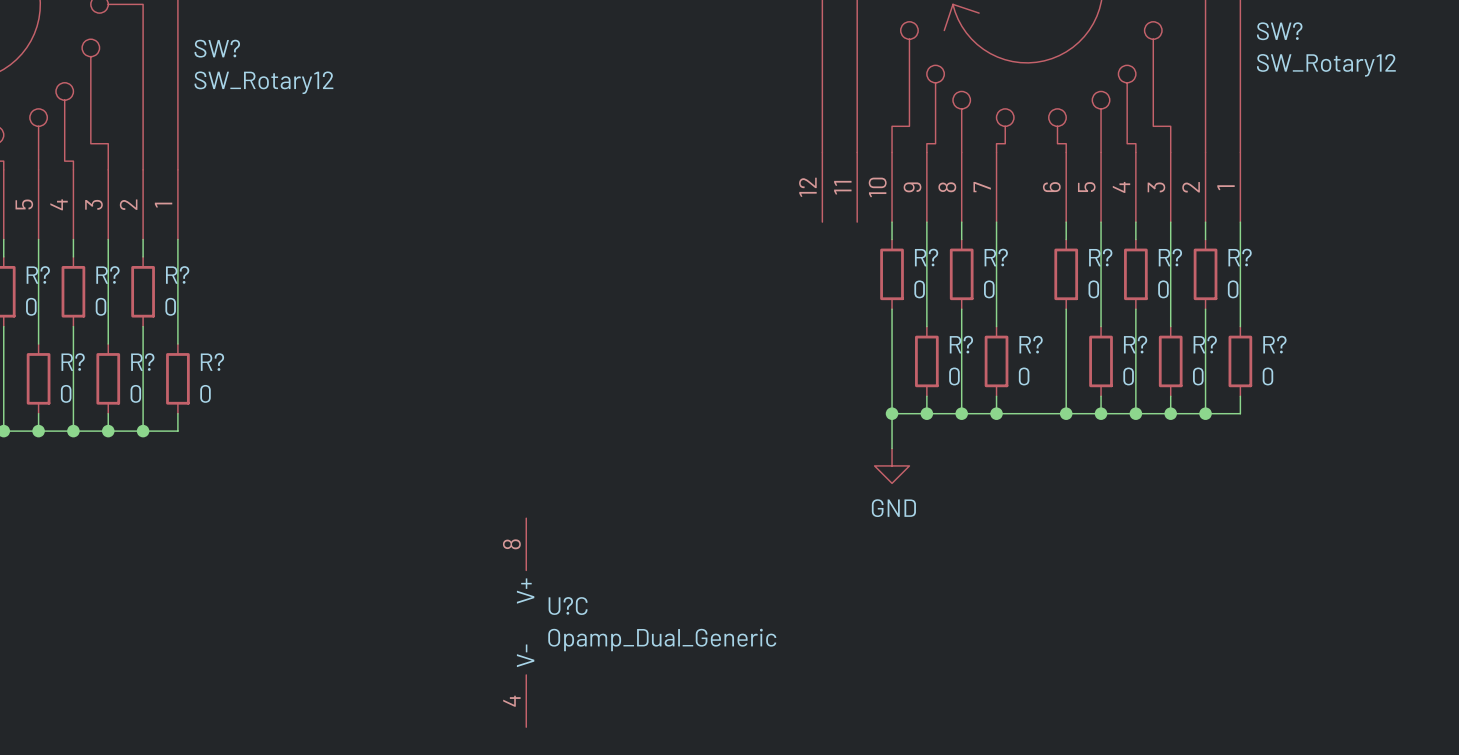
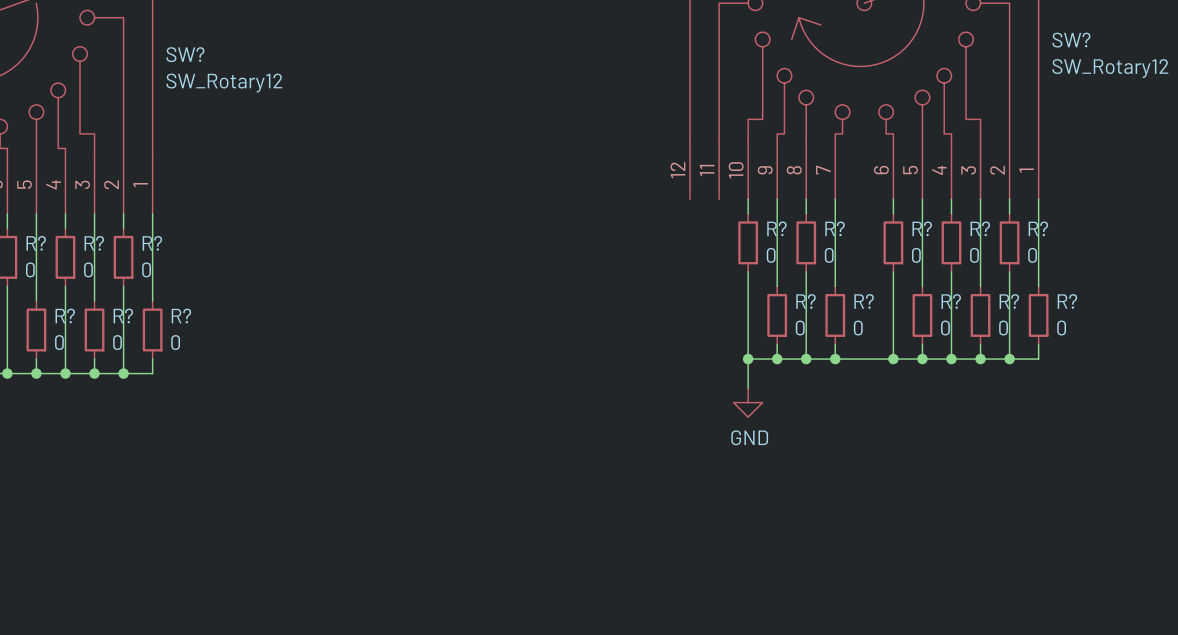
U?C: Opamp_Dual_Generic (526, 622) -> none

